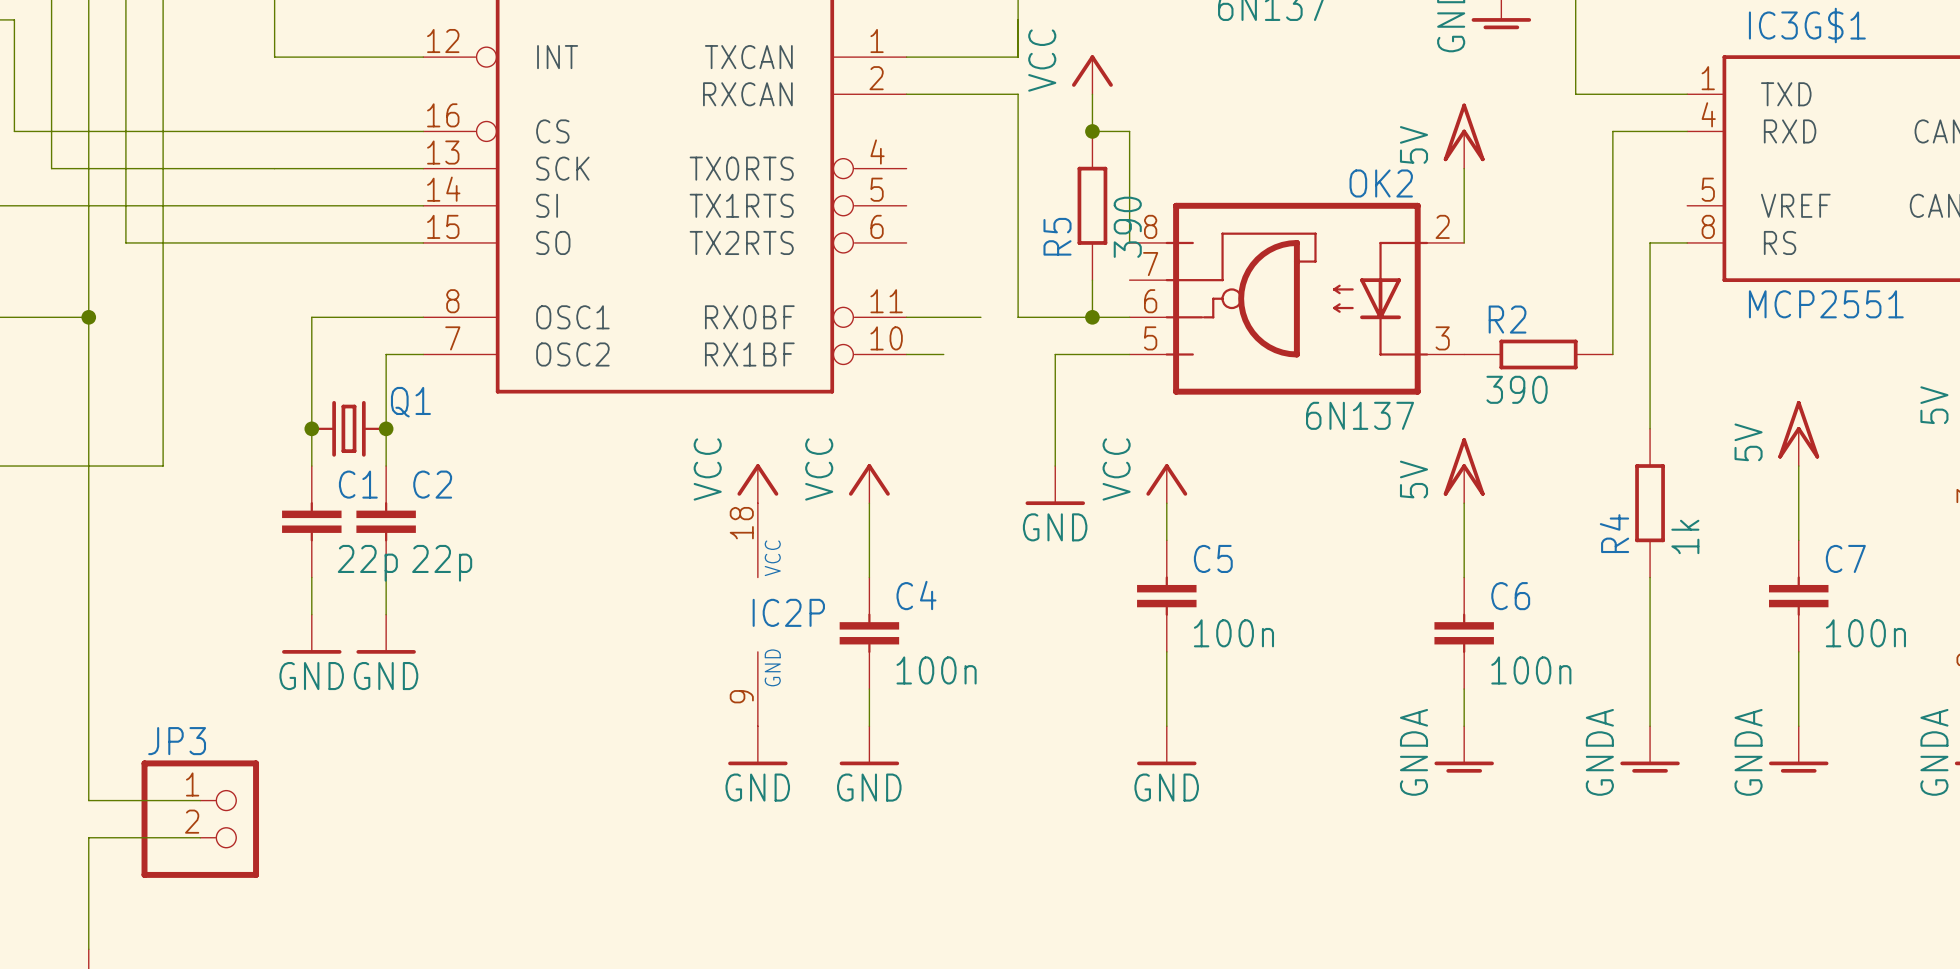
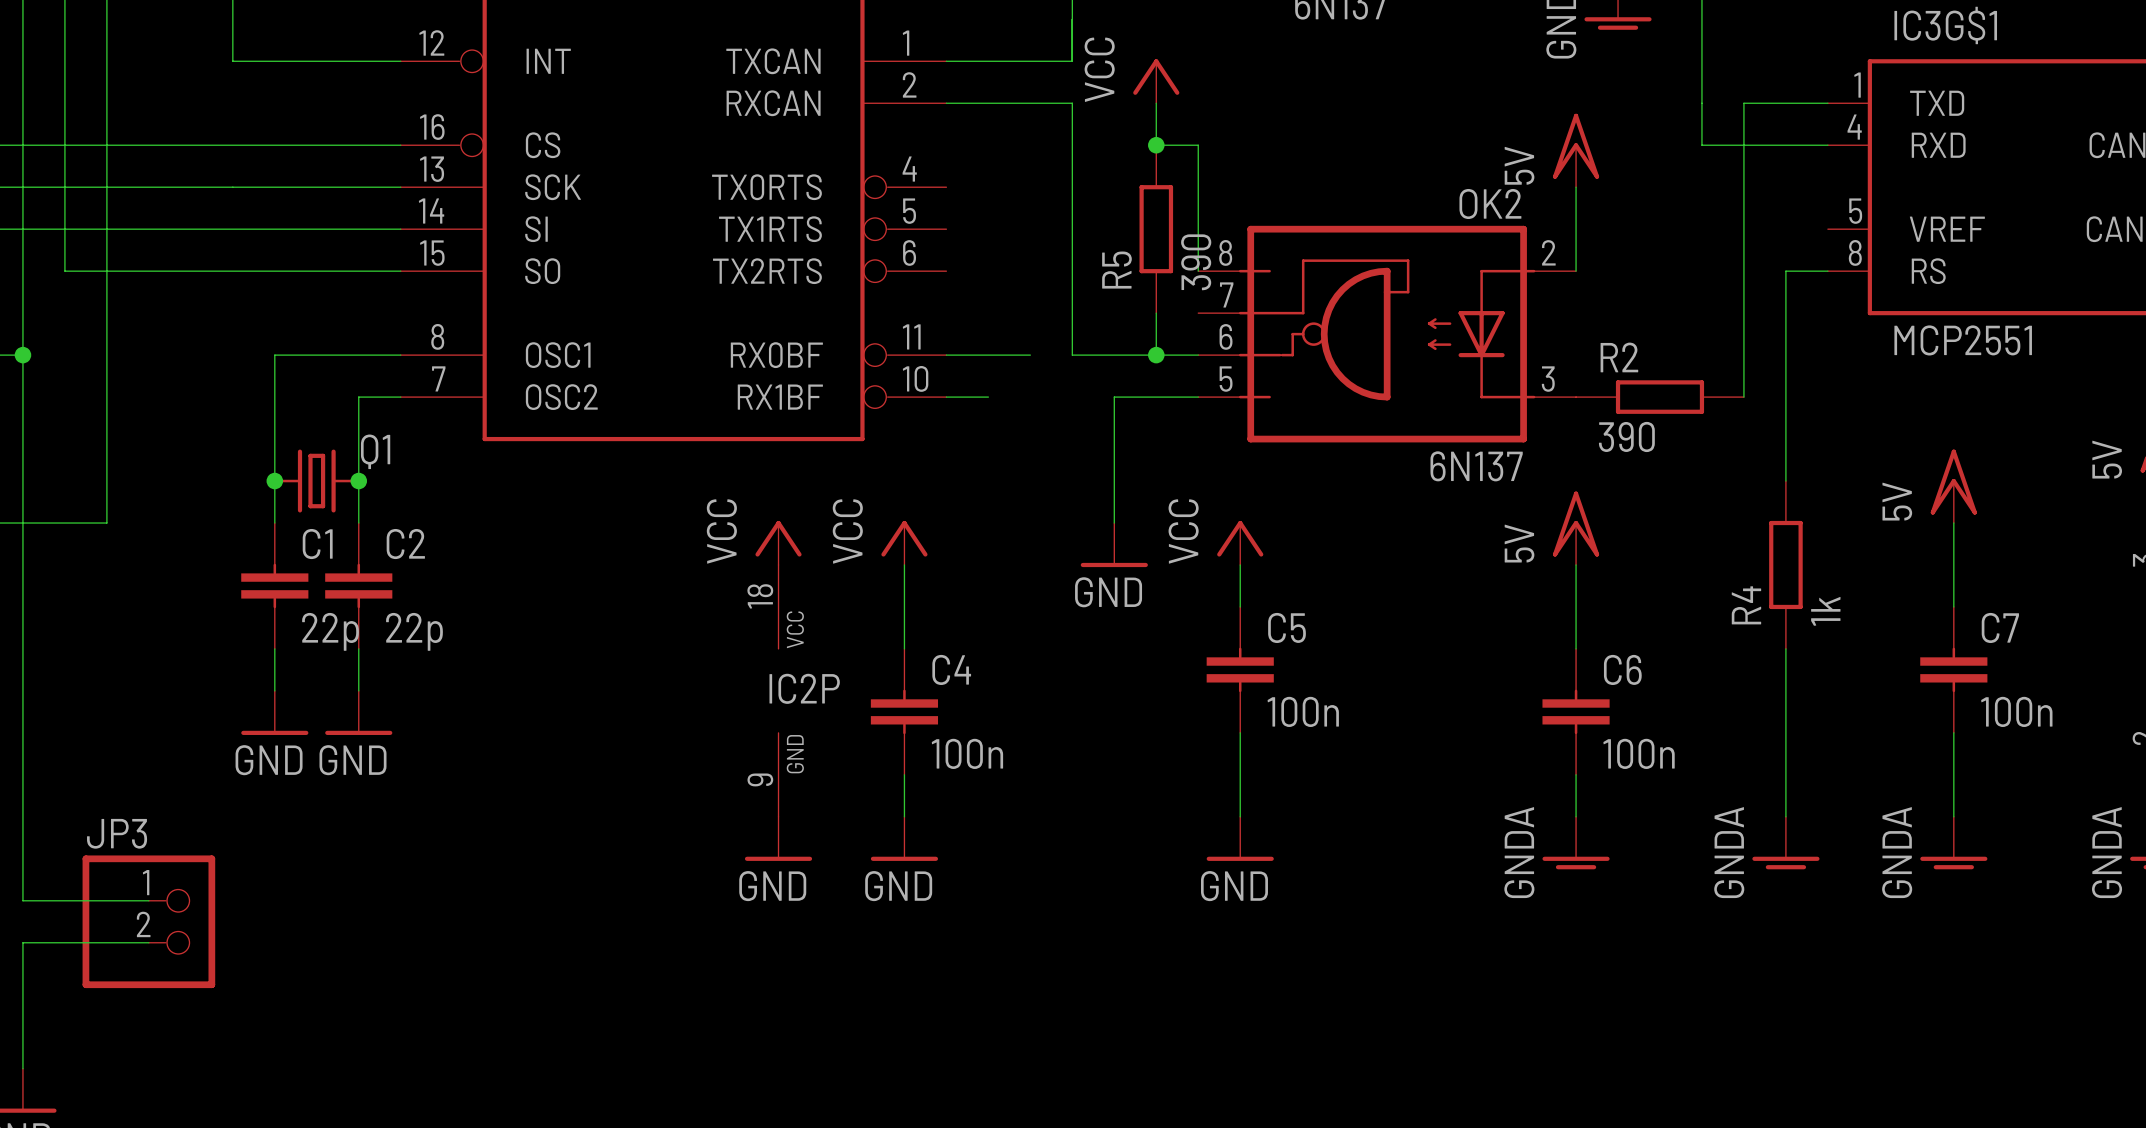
wire: (1575, 94) (1612, 94) -> (1701, 103) (1701, 145) (1743, 145) (1743, 103)

